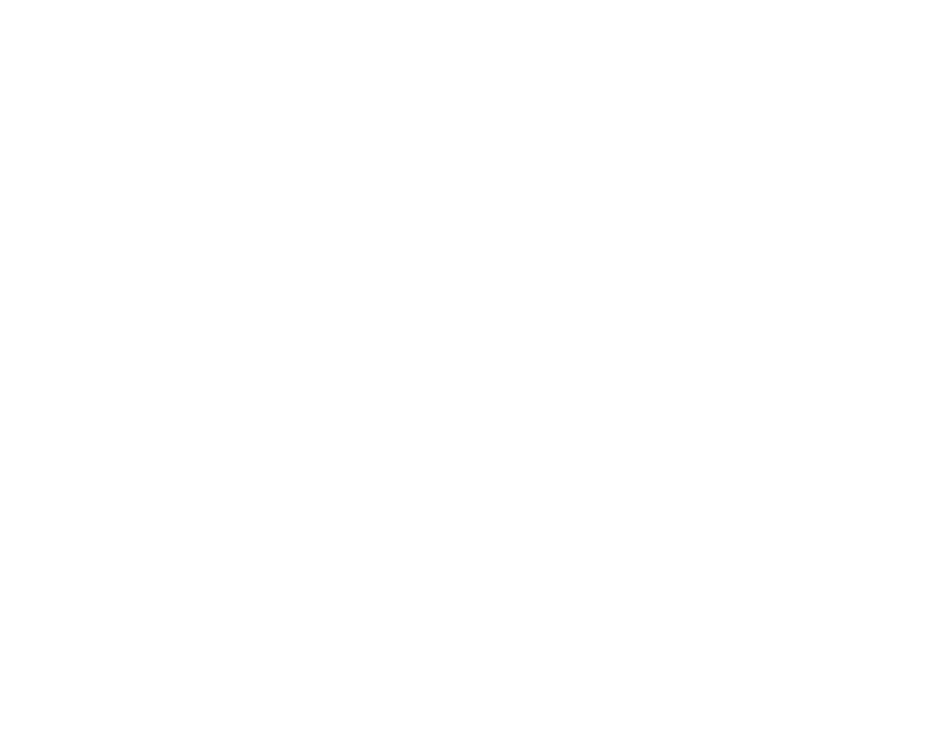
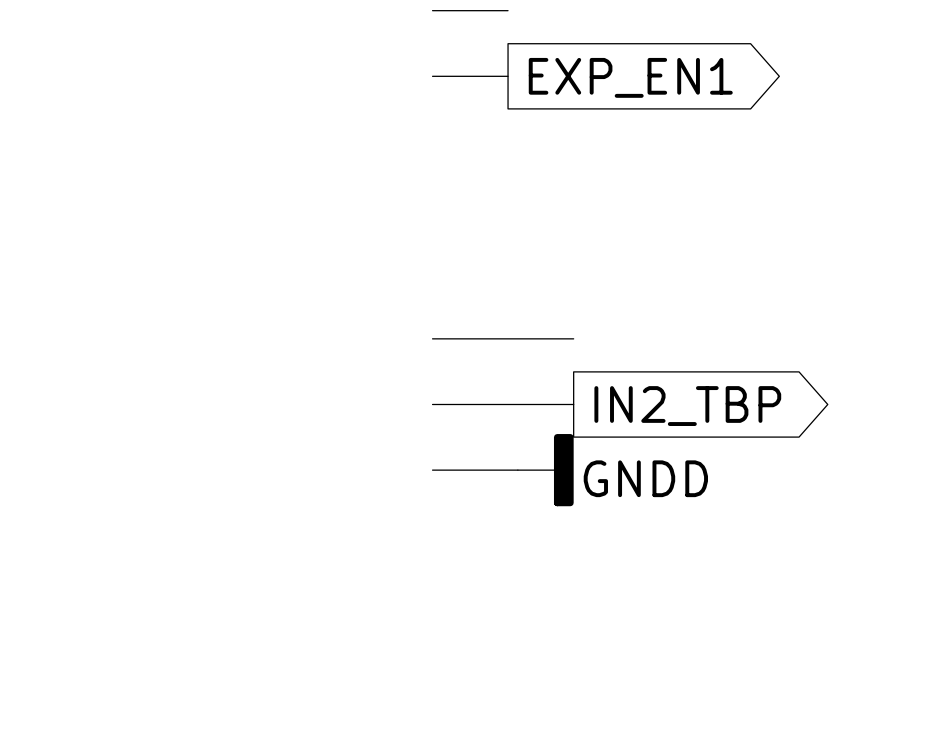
wire: none -> (432, 10) (508, 10)
wire: none -> (432, 76) (508, 76)
global label: none -> EXP_EN1 (630, 77)
wire: none -> (432, 338) (573, 338)
wire: none -> (432, 404) (573, 404)
global label: none -> IN2_TBP (687, 406)
wire: none -> (432, 470) (517, 470)
power symbol: none -> GNDD (545, 470)

